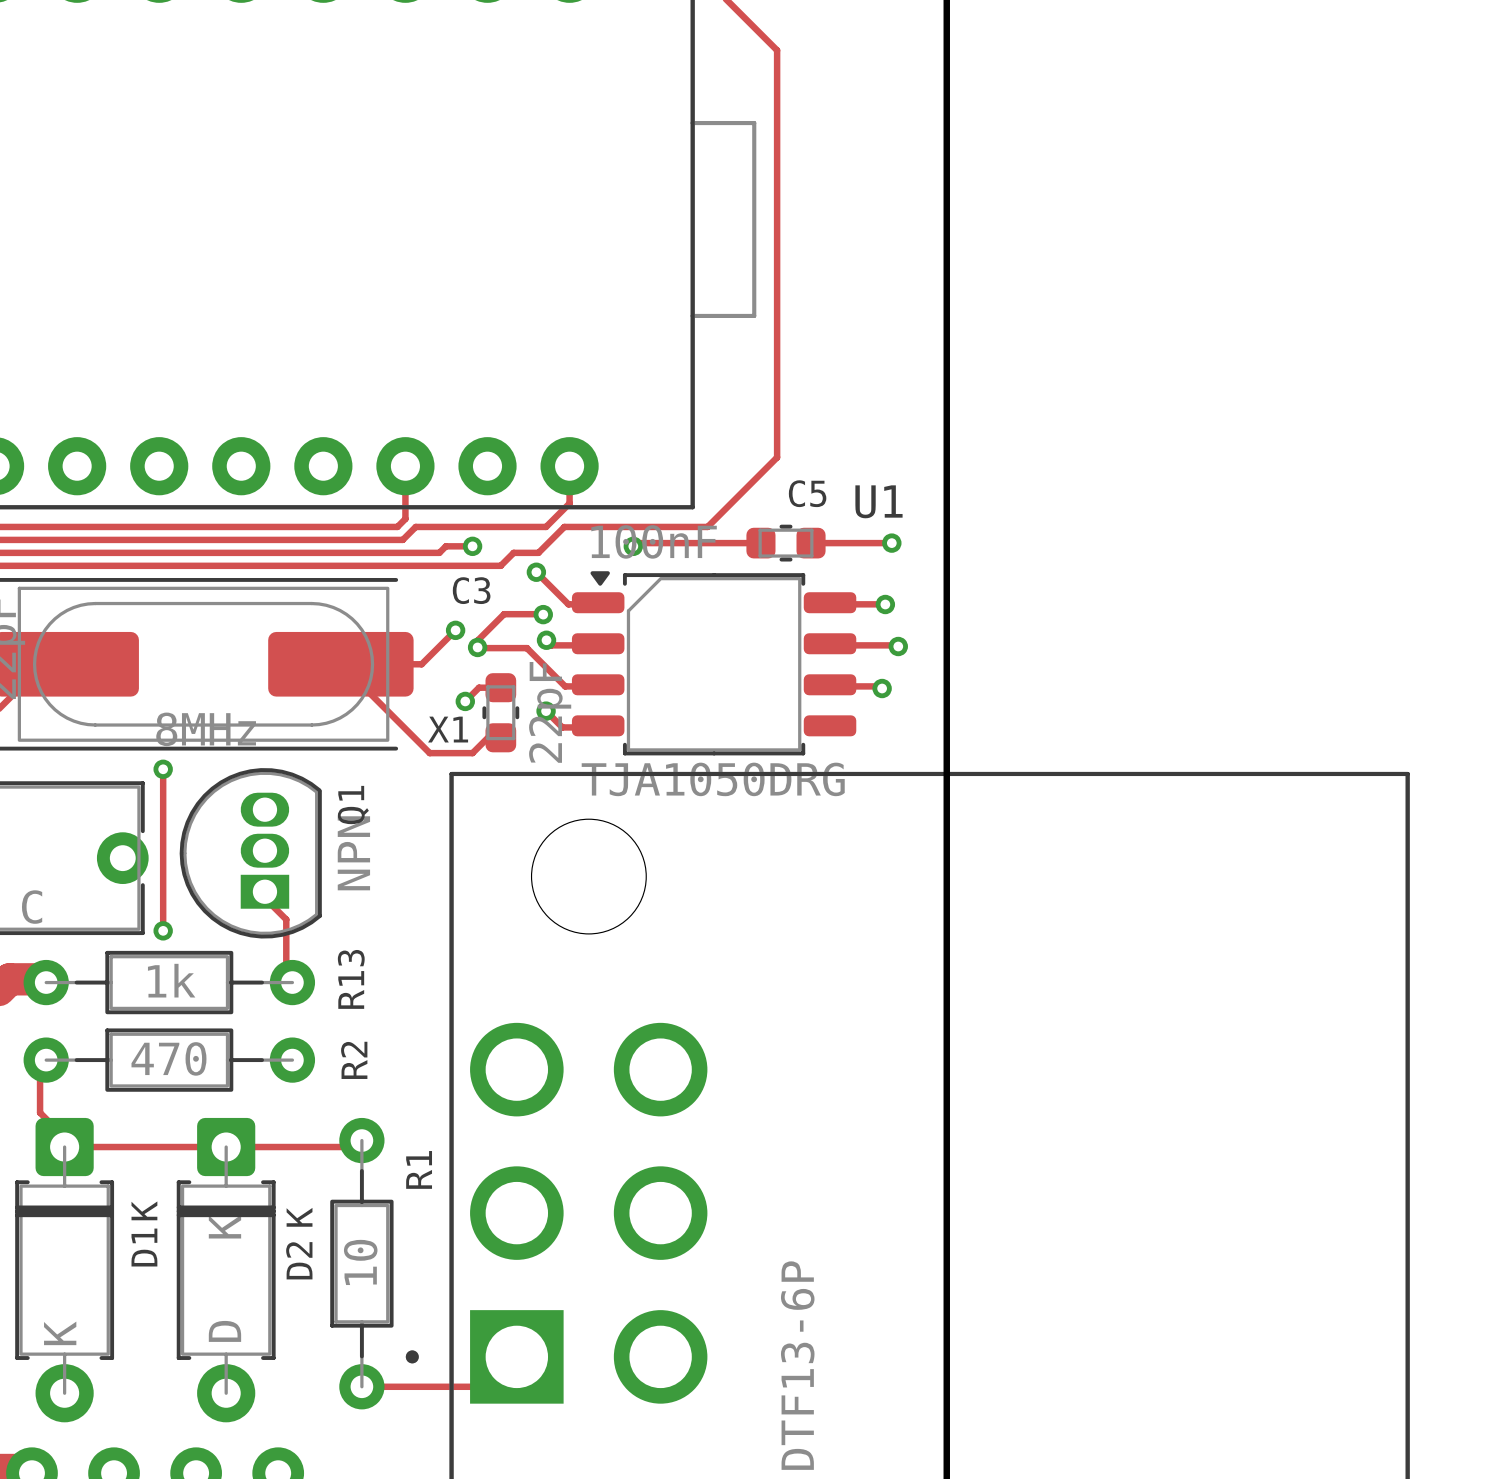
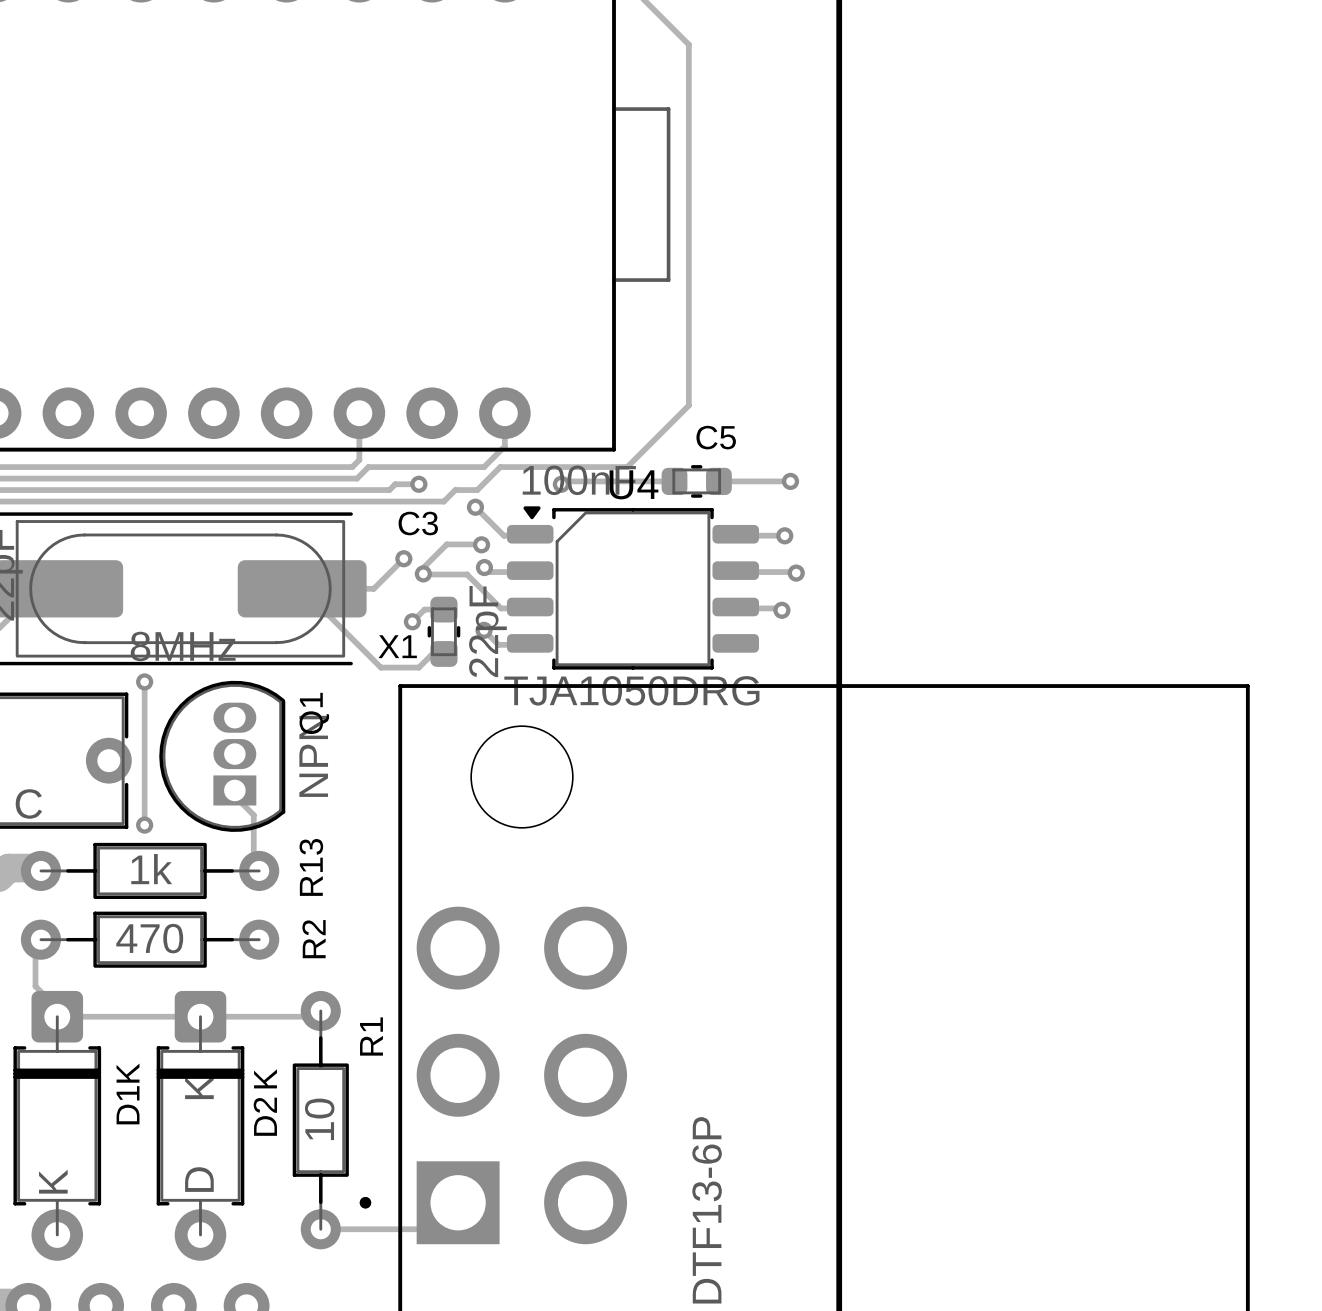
U1 name: U1 (878, 501) -> U4 (633, 484)

